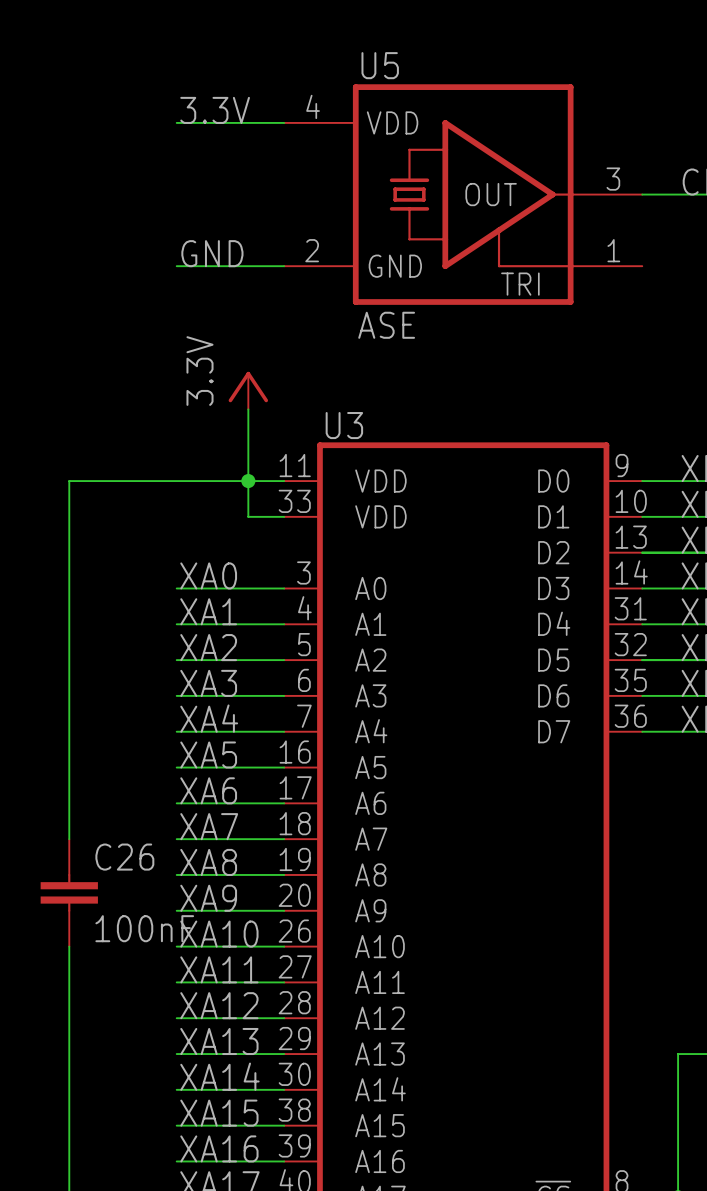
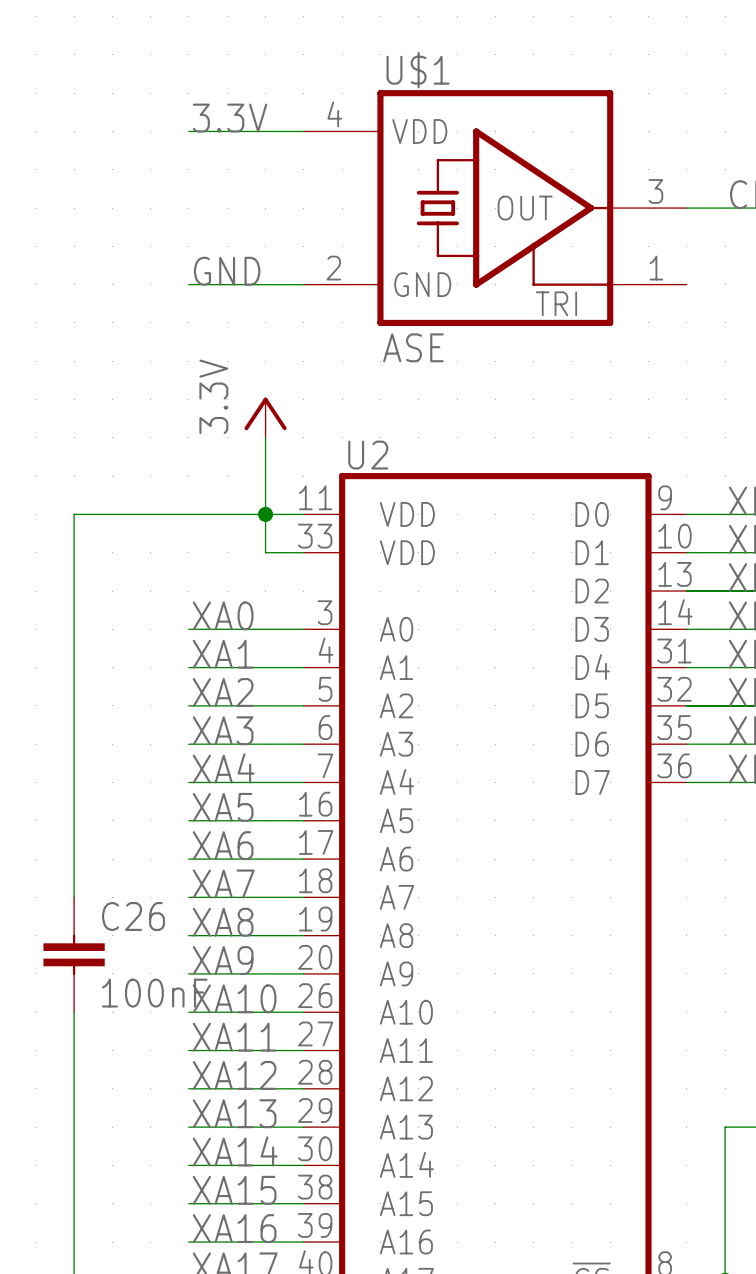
U5 name: U5 (380, 65) -> U$1 (418, 70)
U3 name: U3 (344, 425) -> U2 (368, 455)

